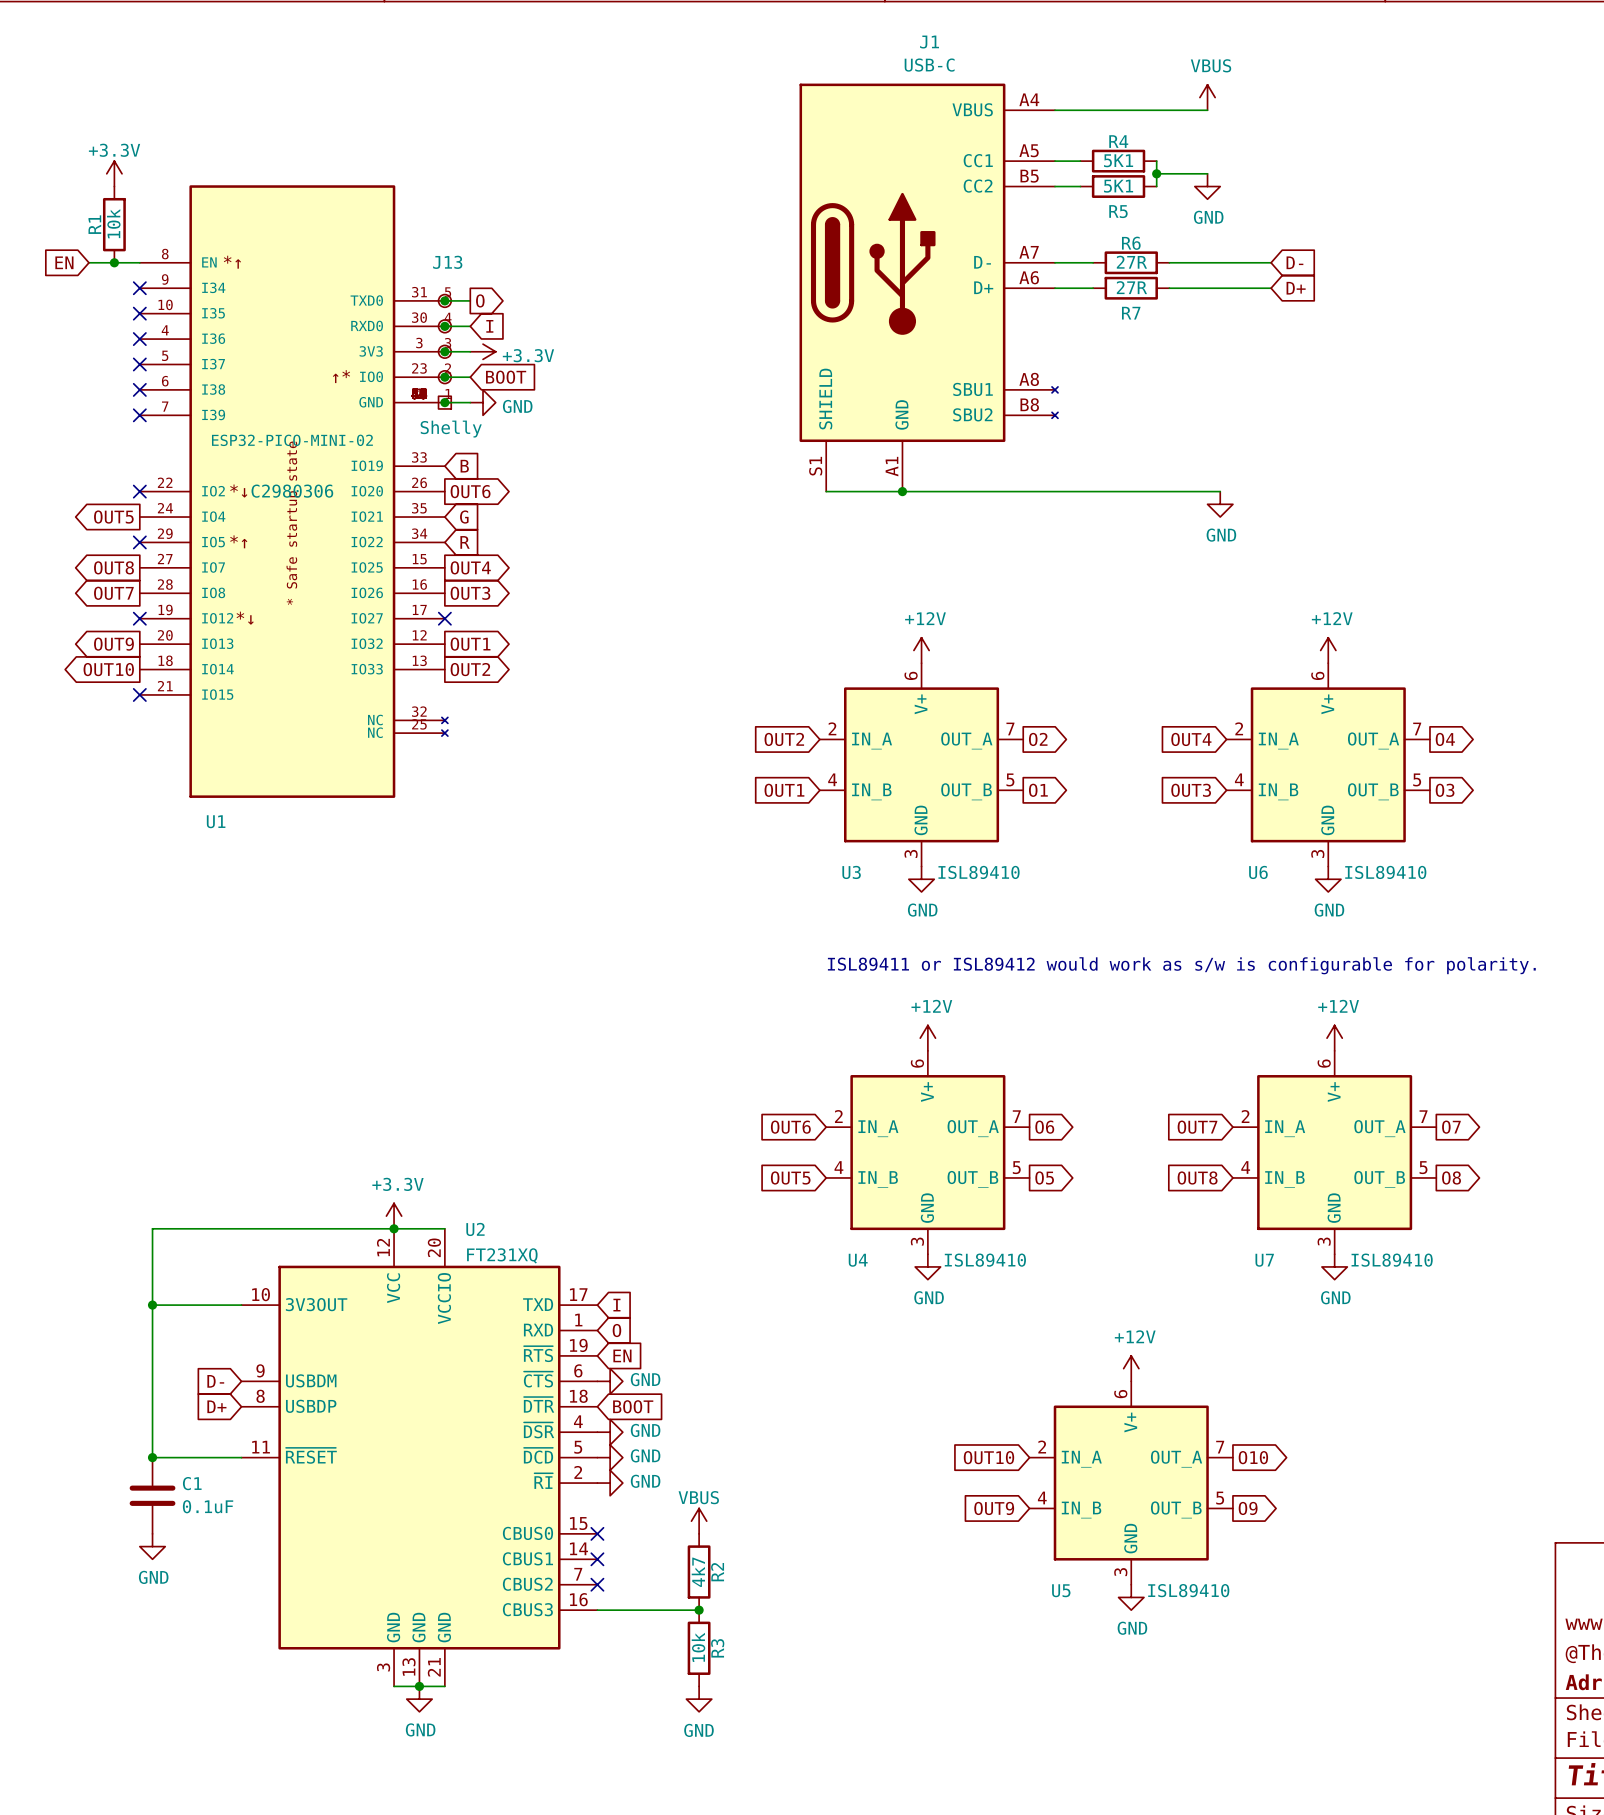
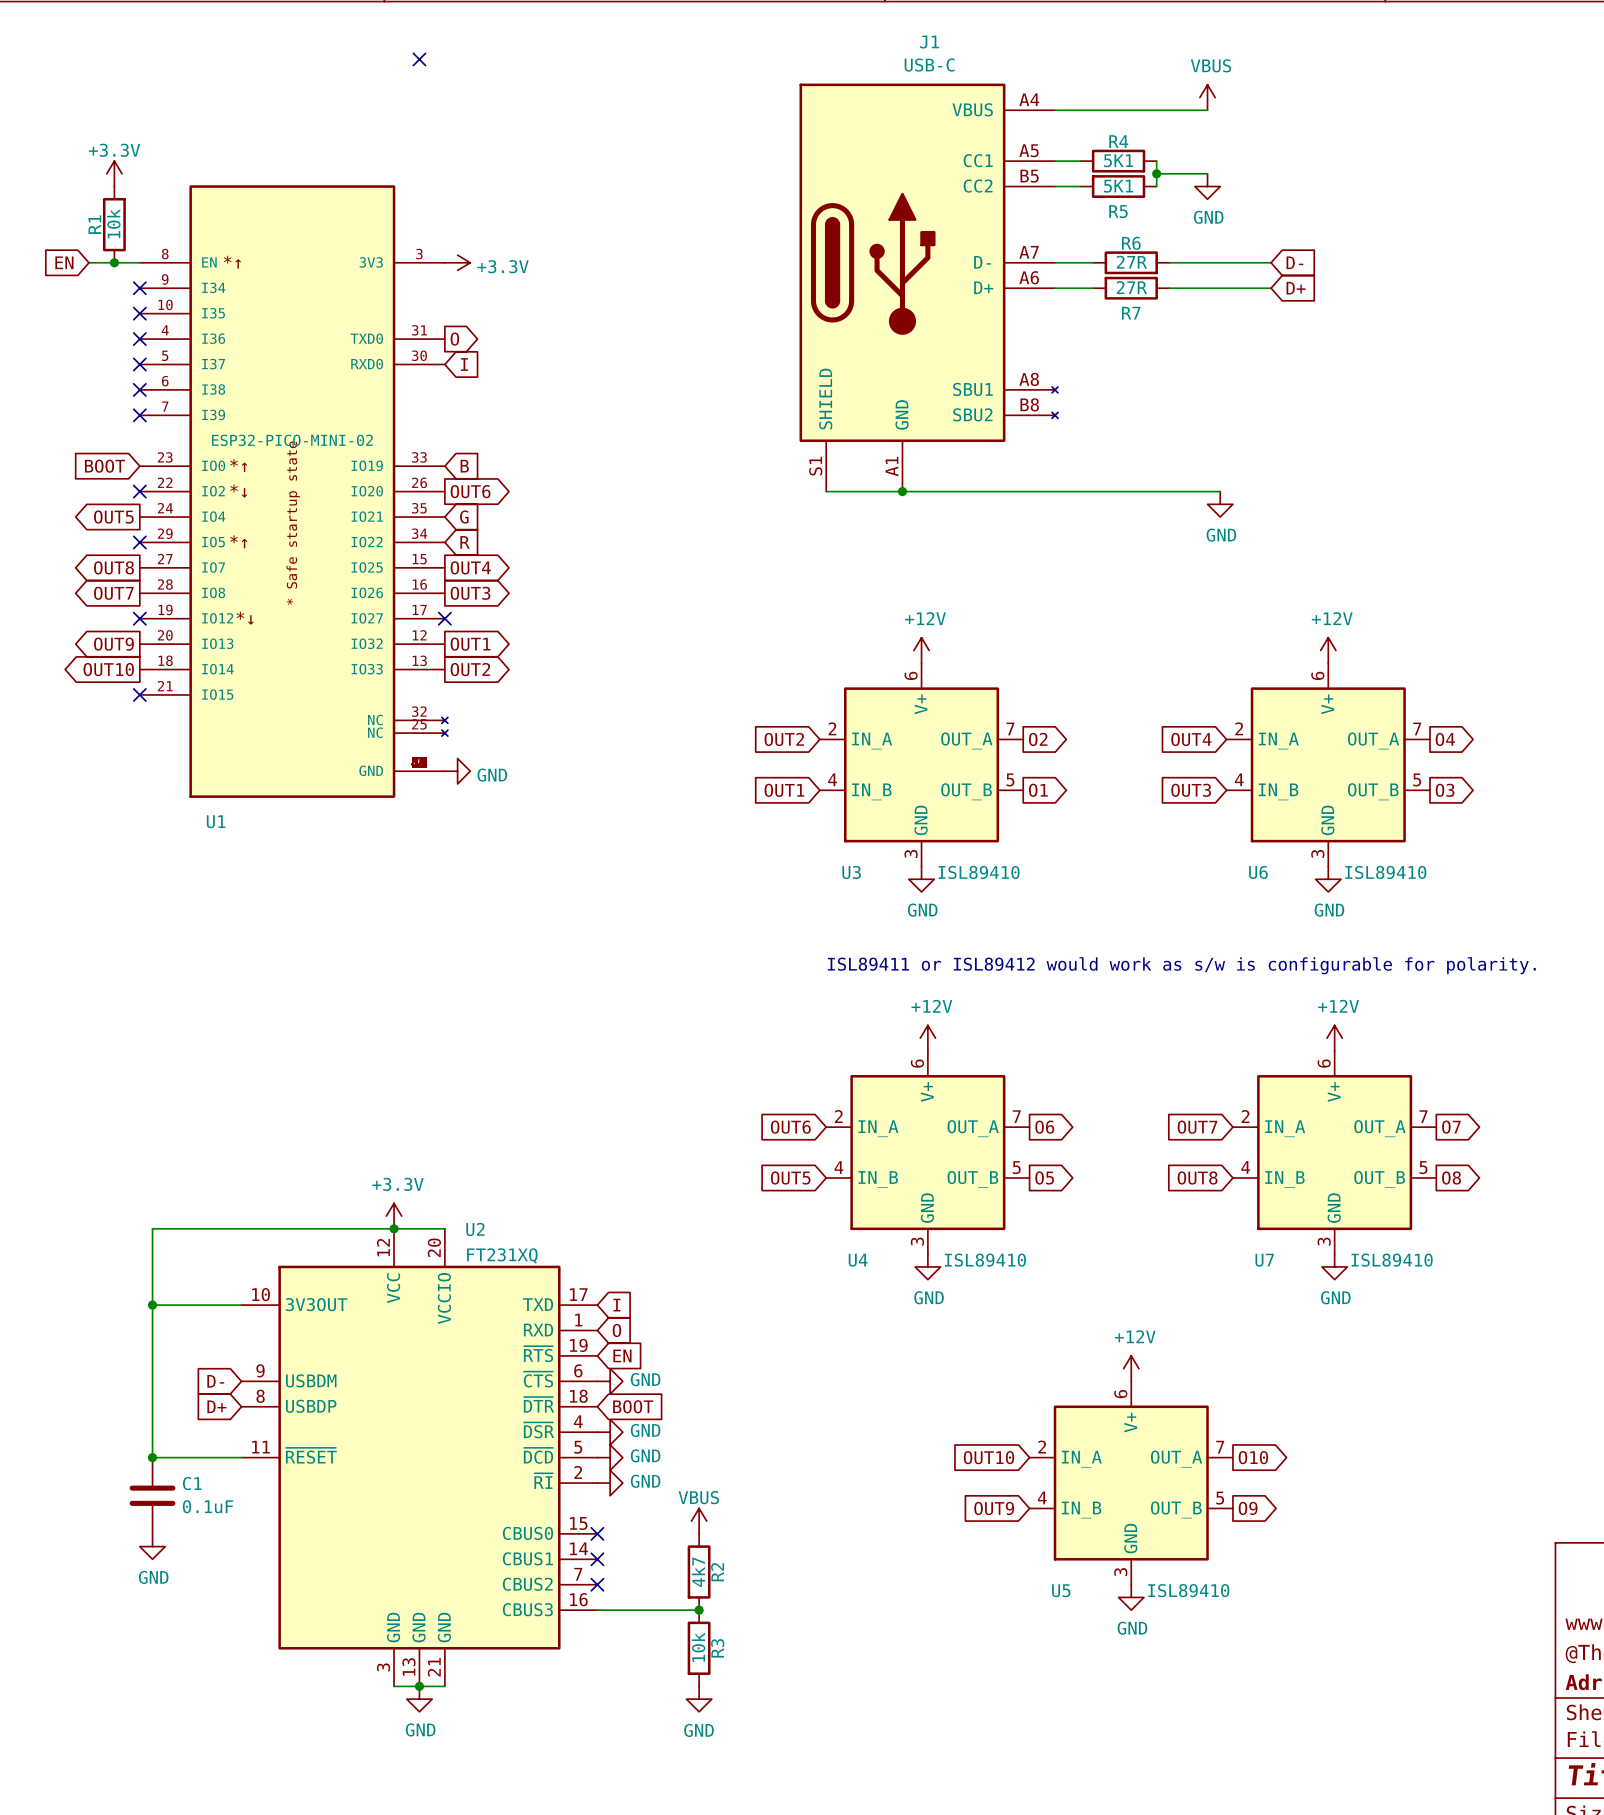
no-connect mark: none -> (419, 59)
U1 symbol: [139, 185, 448, 798] -> [139, 185, 448, 798]
wire: (444, 300) (470, 300) -> none
junction: (444, 300) -> none
global label position: O (480, 300) -> O (454, 339)
junction: (444, 326) -> none
global label position: I (489, 326) -> I (464, 364)
junction: (444, 351) -> none
J13: Shelly (444, 351) -> none
power symbol position: +3.3V (483, 351) -> +3.3V (457, 262)
junction: (444, 377) -> none
global label: BOOT (506, 377) -> none
wire: (444, 402) (470, 402) -> none
junction: (444, 402) -> none
power symbol: GND (483, 402) -> none
global label: none -> BOOT (105, 466)
U1 text: C2980306 (292, 491) -> none
power symbol: none -> GND (457, 771)

